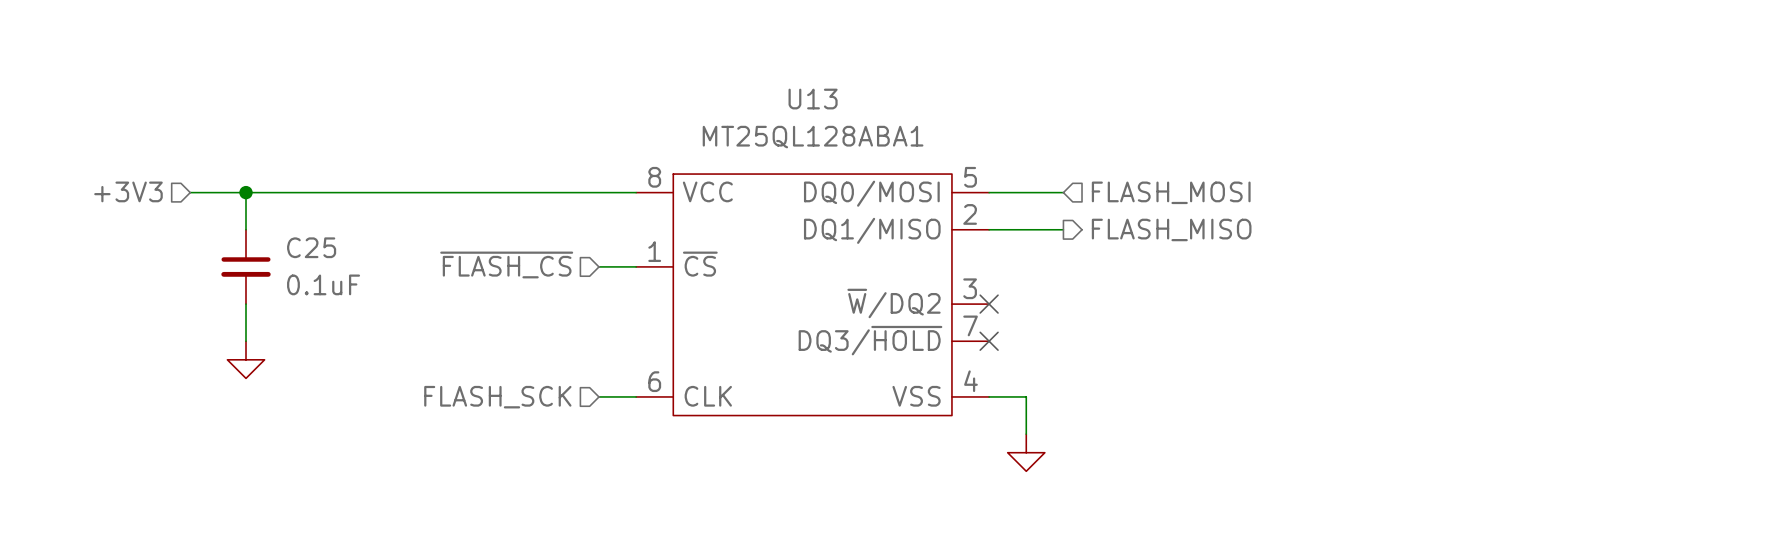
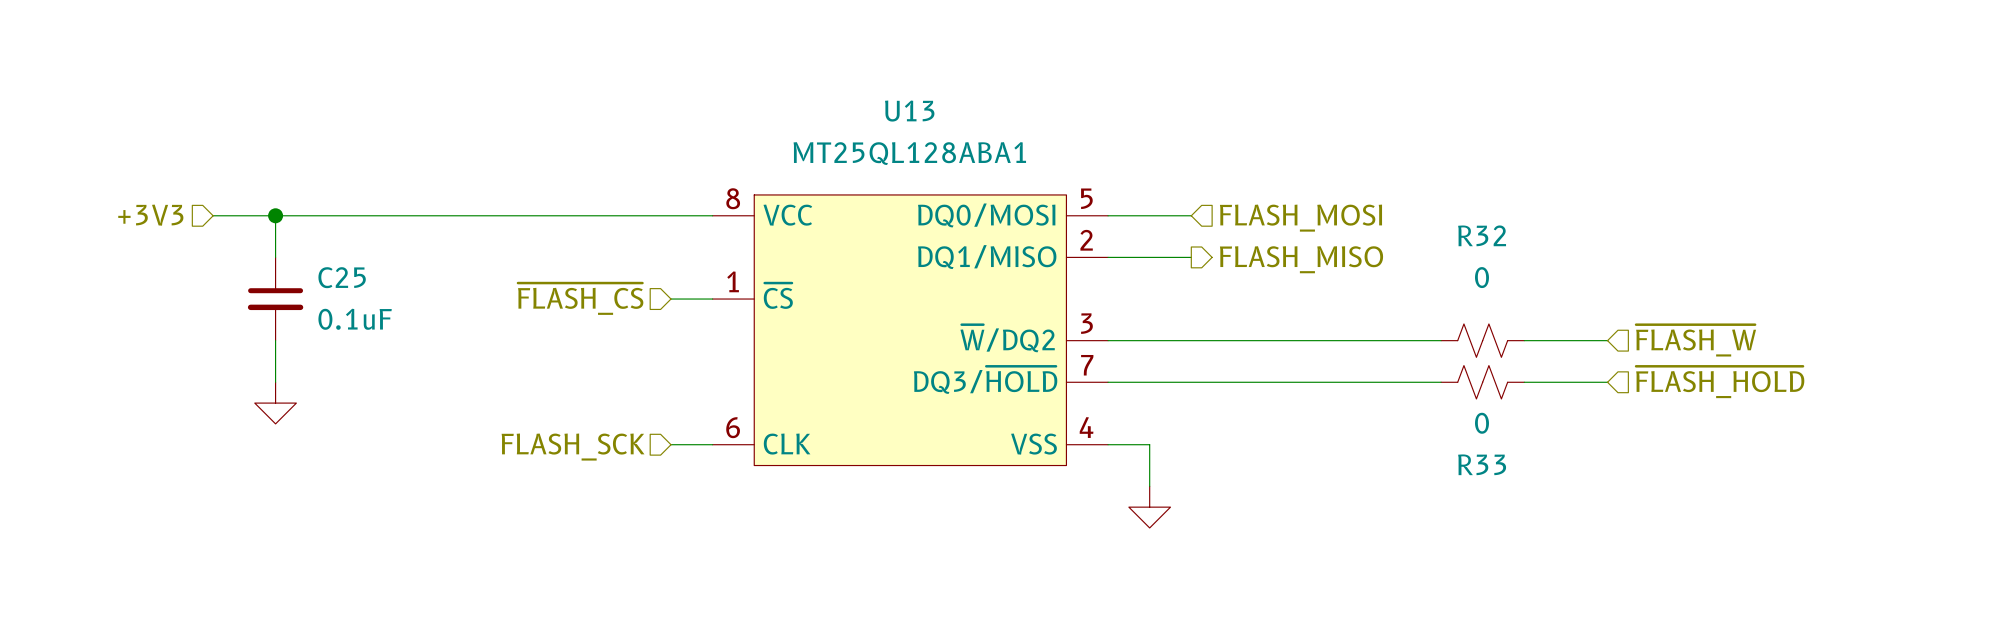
hierarchical label: none -> ~{FLASH_W} (1696, 340)
wire: none -> (1108, 340) (1441, 340)
no-connect mark: (989, 304) -> none
R32: none -> 0 (1482, 340)
wire: none -> (1524, 340) (1607, 340)
hierarchical label: none -> ~{FLASH_HOLD} (1720, 382)
wire: none -> (1108, 382) (1441, 382)
no-connect mark: (989, 341) -> none
R33: none -> 0 (1482, 382)
wire: none -> (1524, 382) (1607, 382)

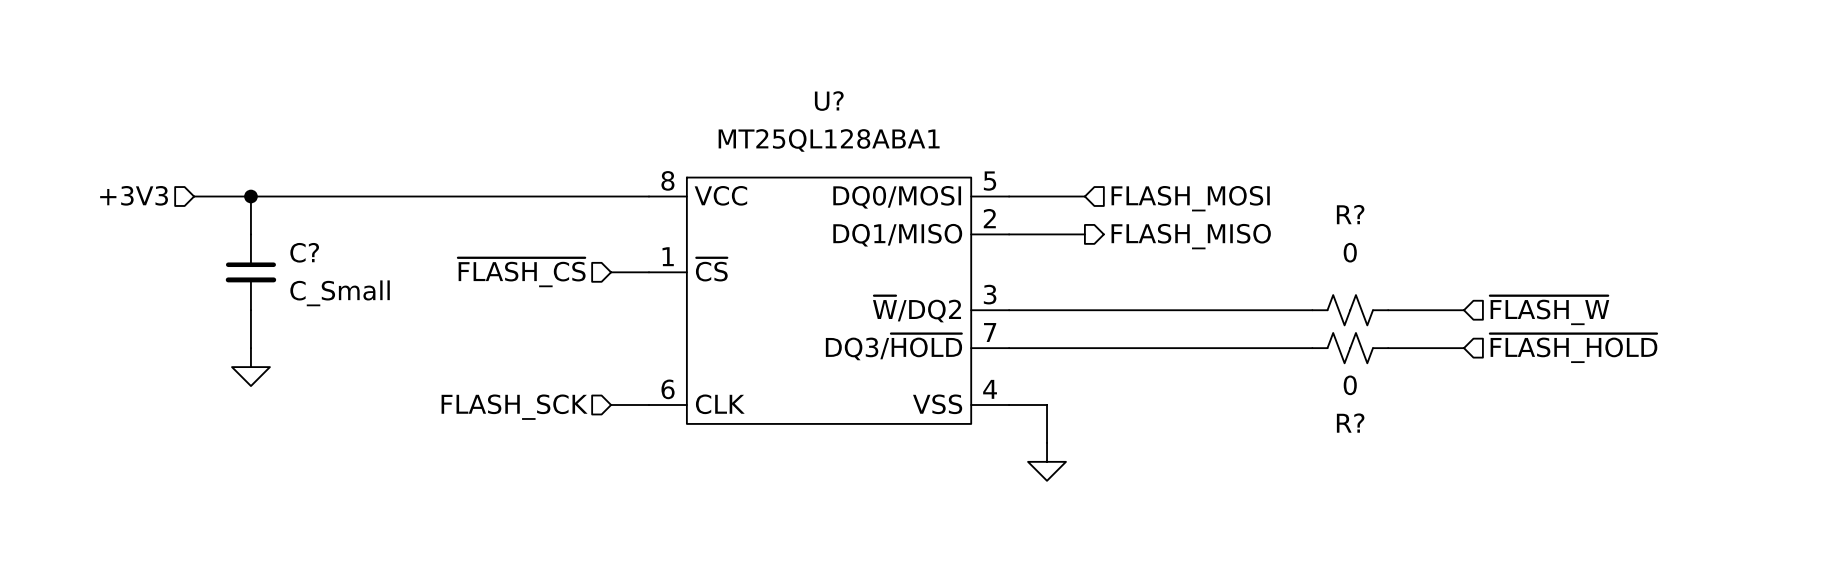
U13 name: U13 (909, 111) -> U? (829, 101)
R32 name: R32 (1482, 235) -> R? (1350, 214)
C25 name: C25 (342, 277) -> C? (304, 252)
C25 value: 0.1uF (355, 319) -> C_Small (340, 293)
R33 name: R33 (1482, 464) -> R? (1350, 423)

